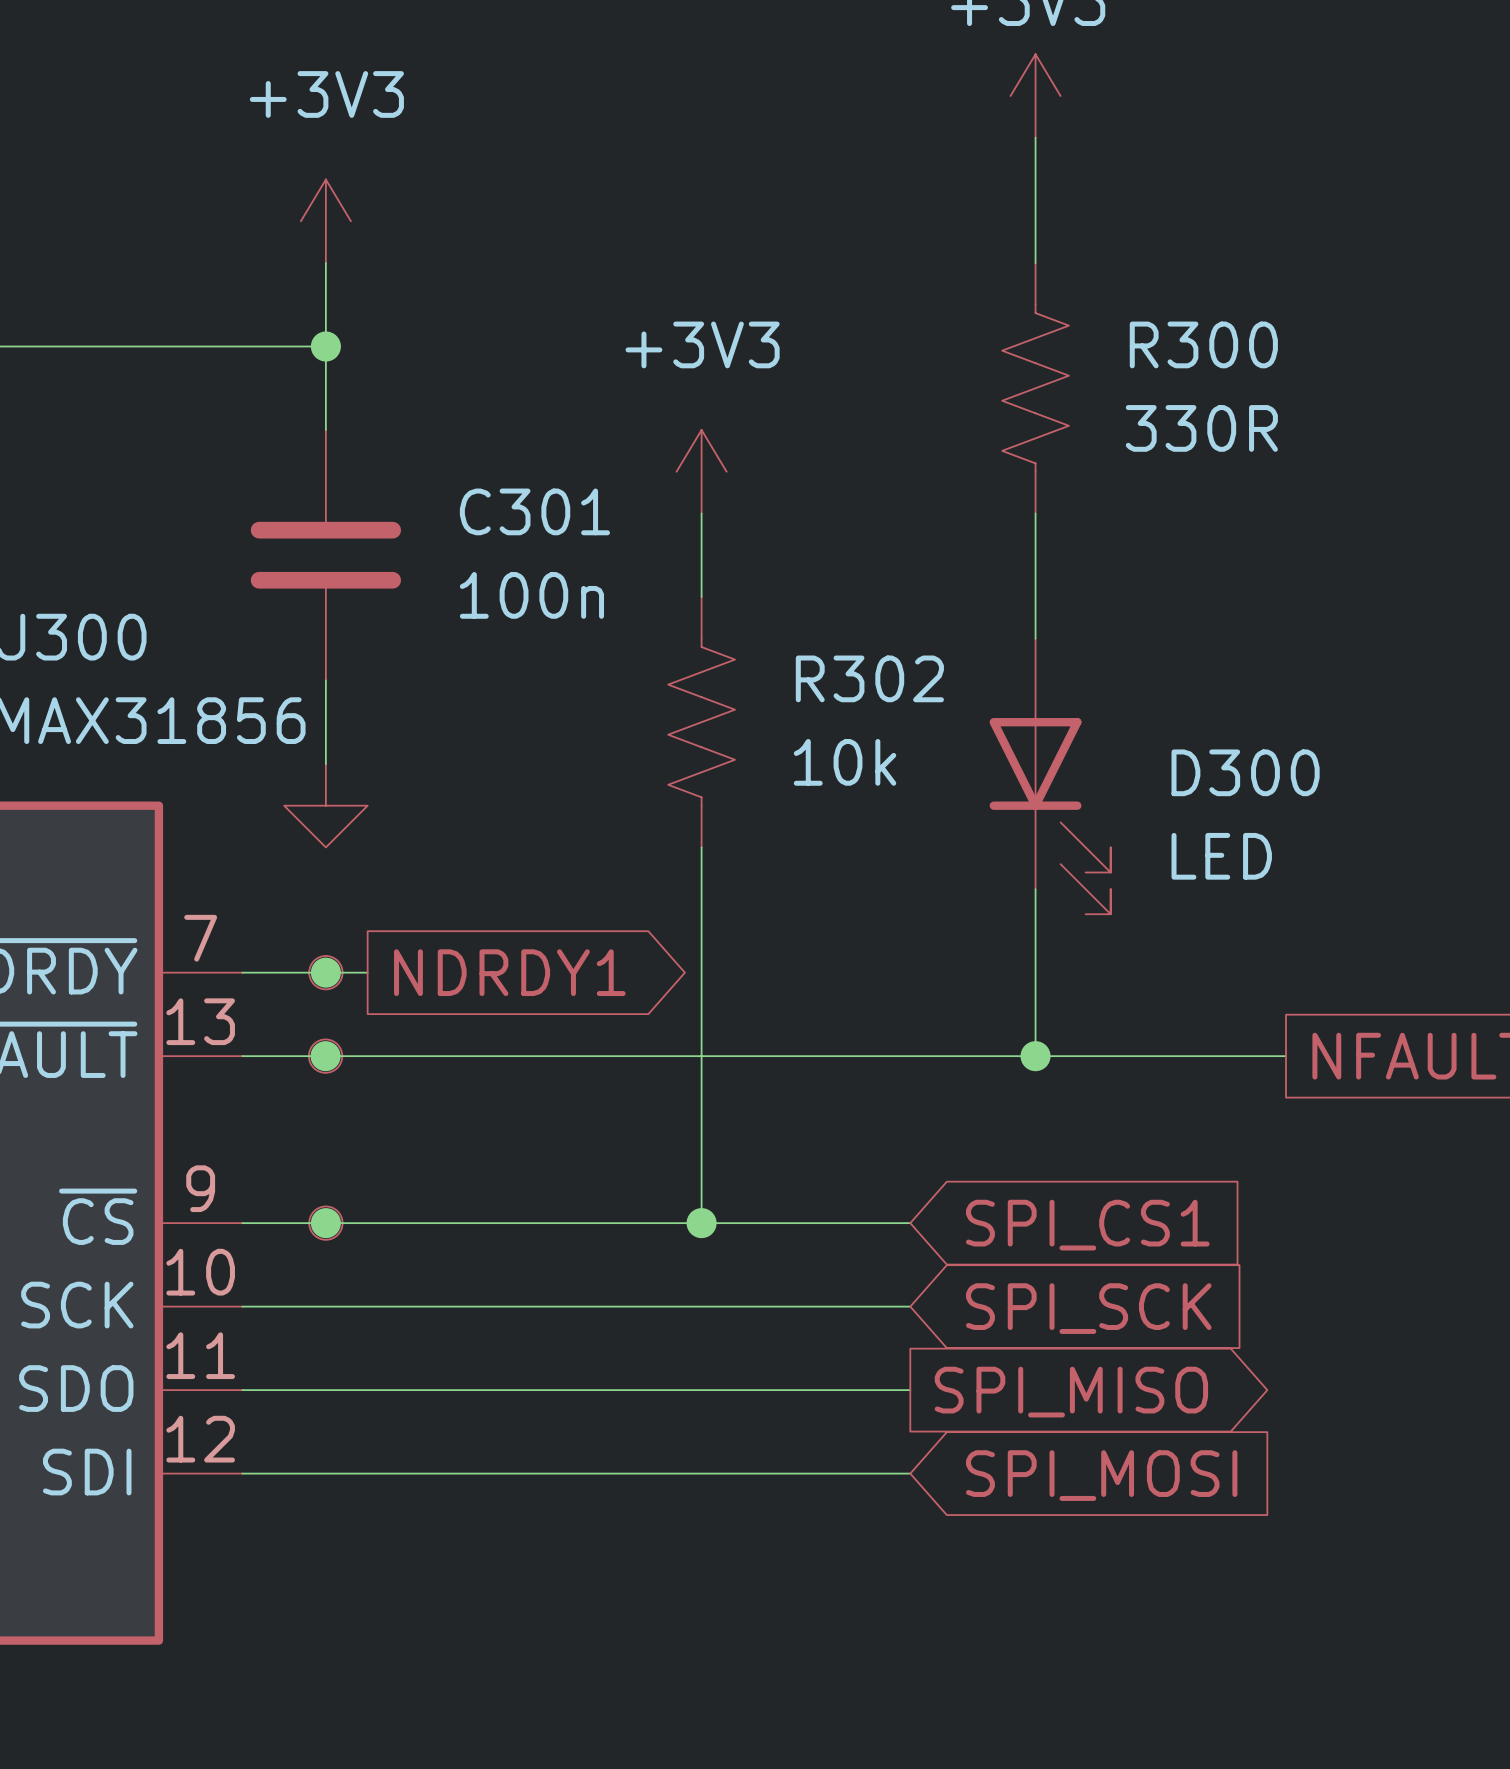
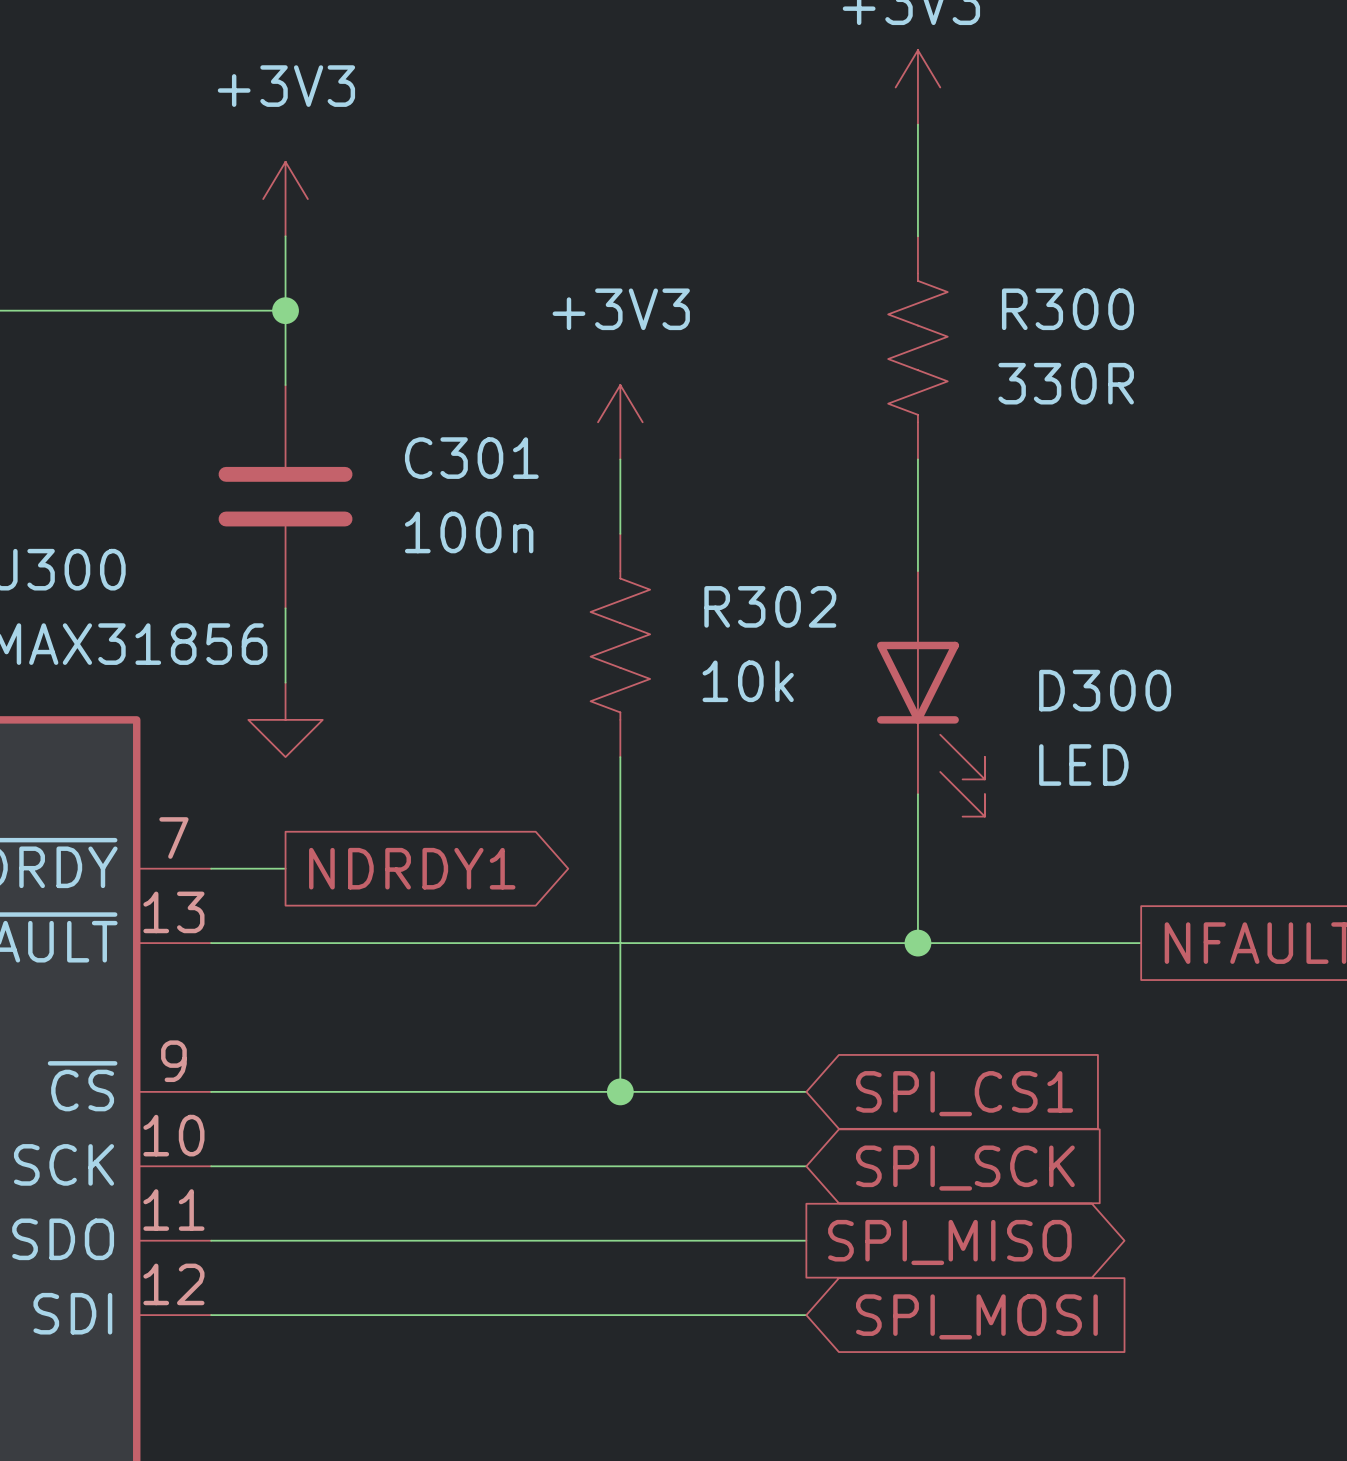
wire: (325, 972) (367, 972) -> none
junction: (325, 972) -> none
part: (325, 972) -> none
global label position: NDRDY1 (509, 972) -> NDRDY1 (412, 868)
junction: (325, 1056) -> none
part: (325, 1056) -> none
junction: (325, 1223) -> none
part: (325, 1223) -> none

